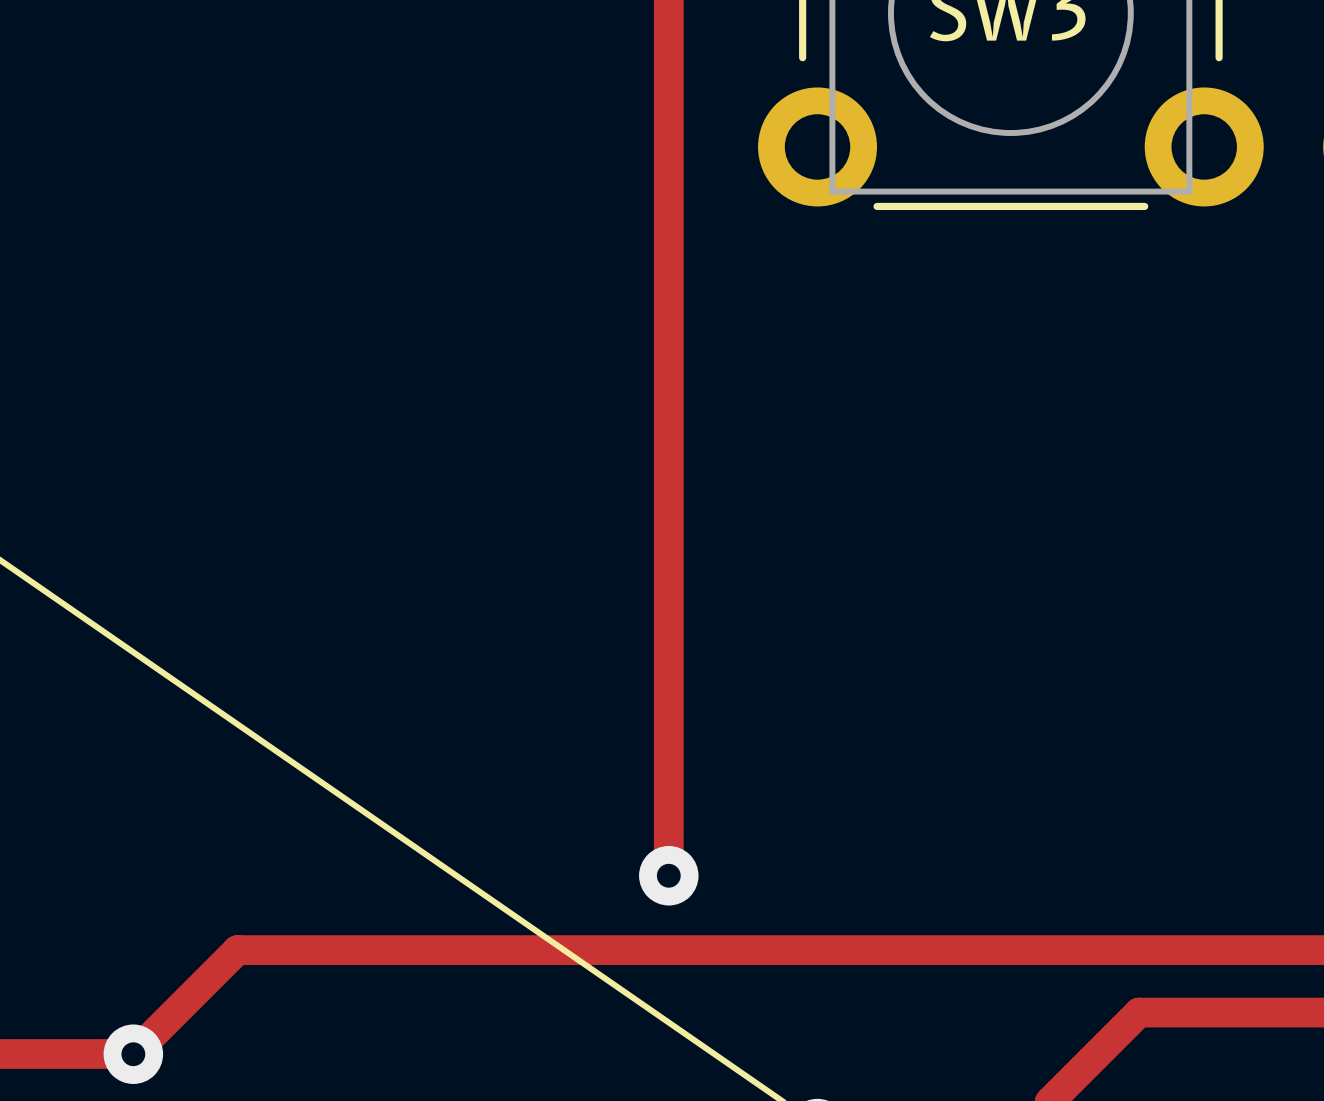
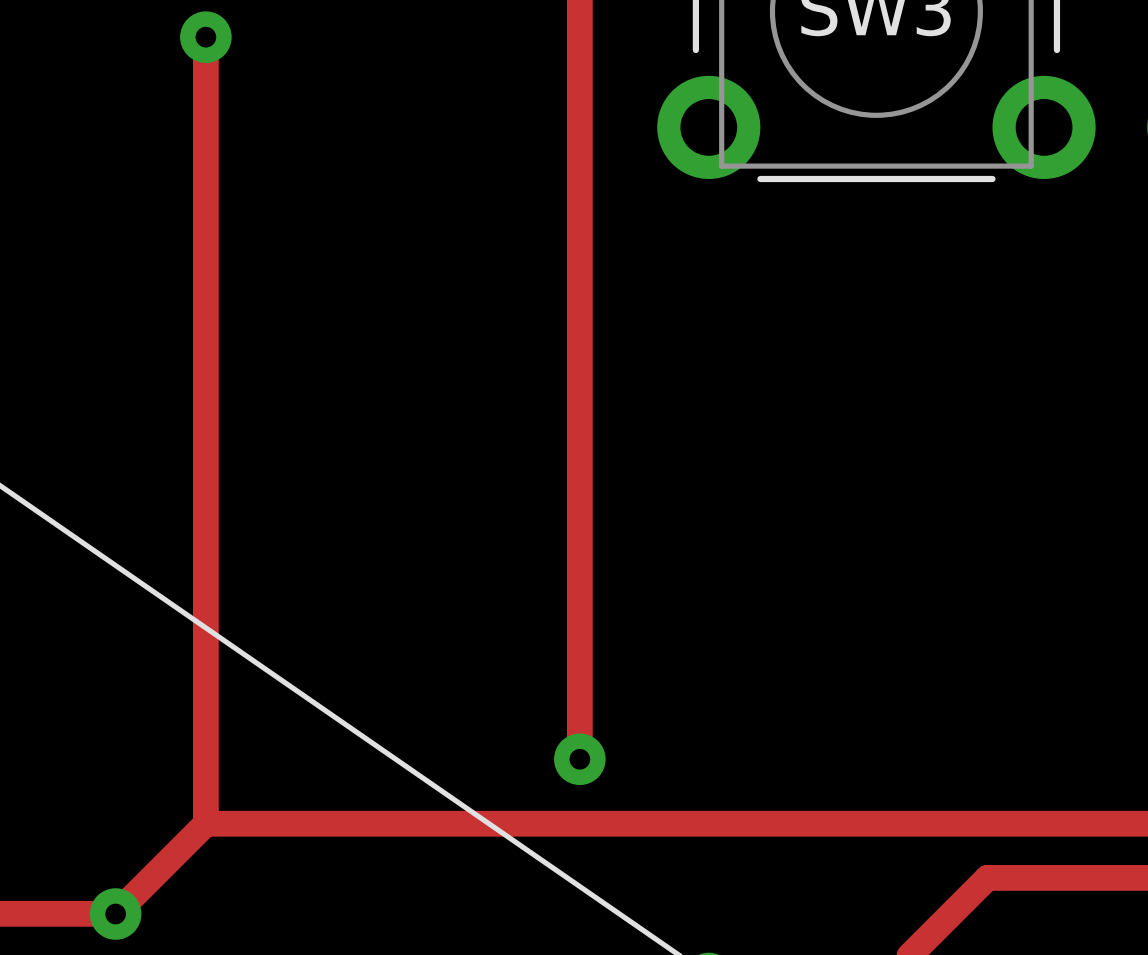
track: none -> (205, 37) (205, 823)
via: none -> (205, 37)

